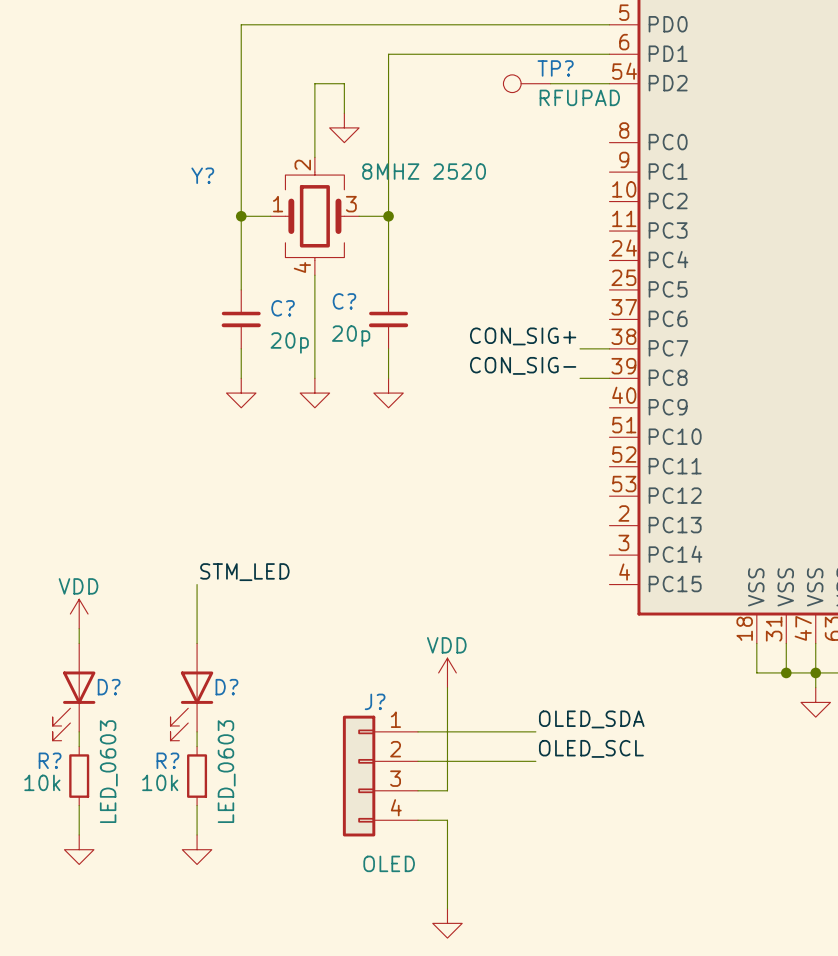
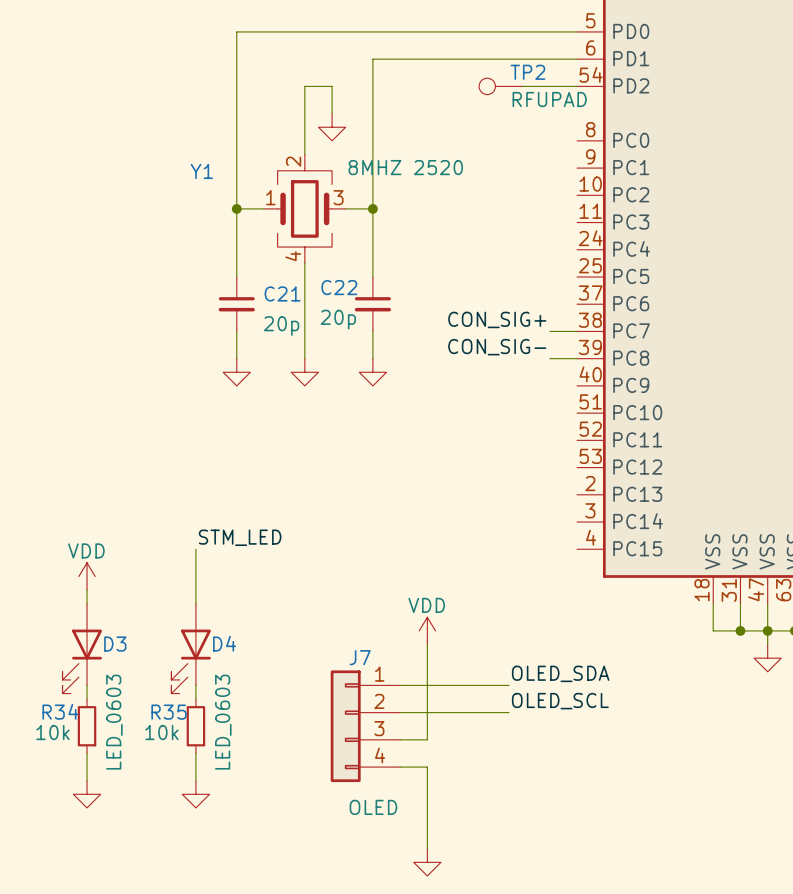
TP? name: TP? (555, 68) -> TP2 (527, 72)
Y? name: Y? (202, 175) -> Y1 (201, 171)
C? name: C? (344, 301) -> C22 (339, 287)
C? name: C? (283, 308) -> C21 (282, 293)
D? name: D? (109, 687) -> D3 (115, 644)
D? name: D? (226, 687) -> D4 (224, 643)
J? name: J? (375, 701) -> J7 (360, 657)
R? name: R? (50, 760) -> R34 (60, 711)
R? name: R? (167, 760) -> R35 (169, 712)

